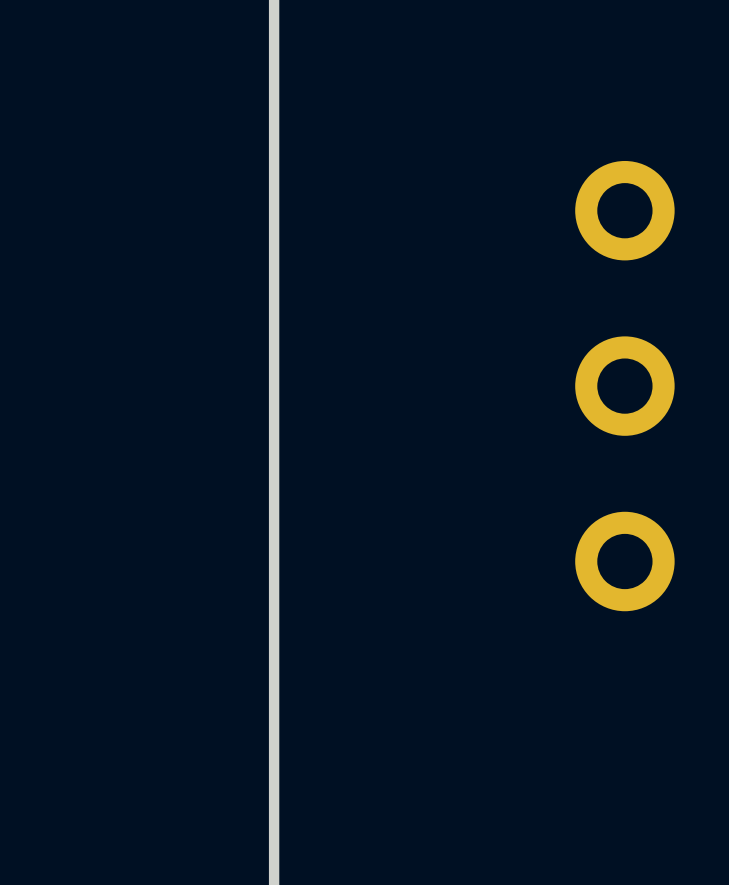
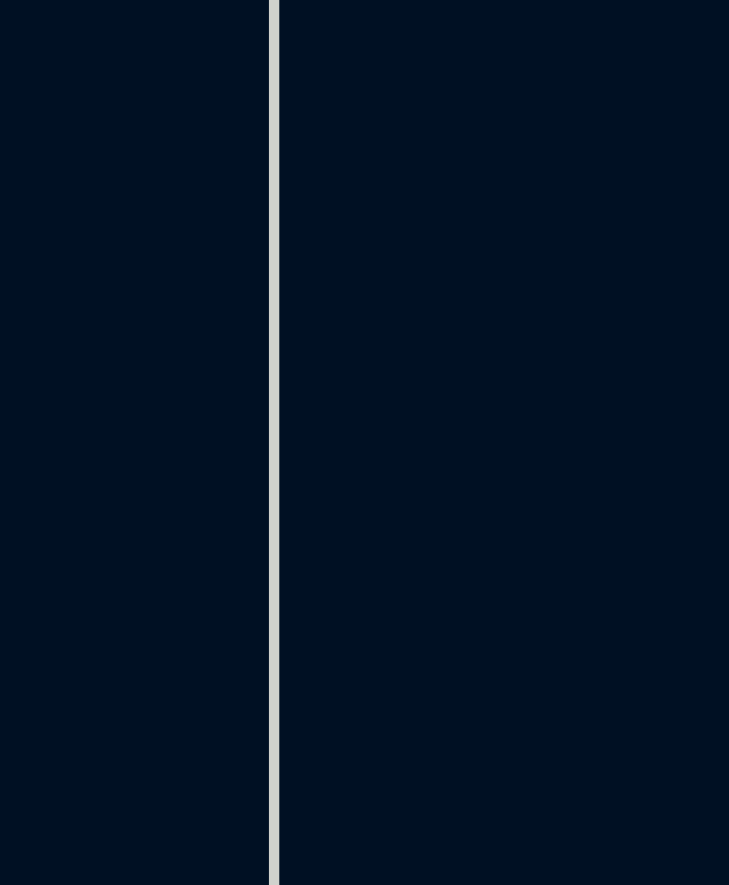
part: (624, 386) -> none

